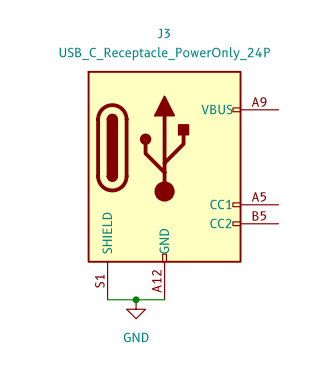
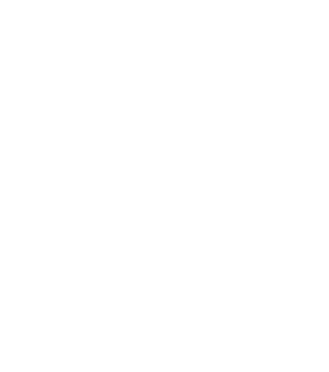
J3: USB_C_Receptacle_PowerOnly_24P (183, 185) -> none
wire: (107, 299) (164, 299) -> none
junction: (136, 299) -> none
power symbol: GND (136, 309) -> none

